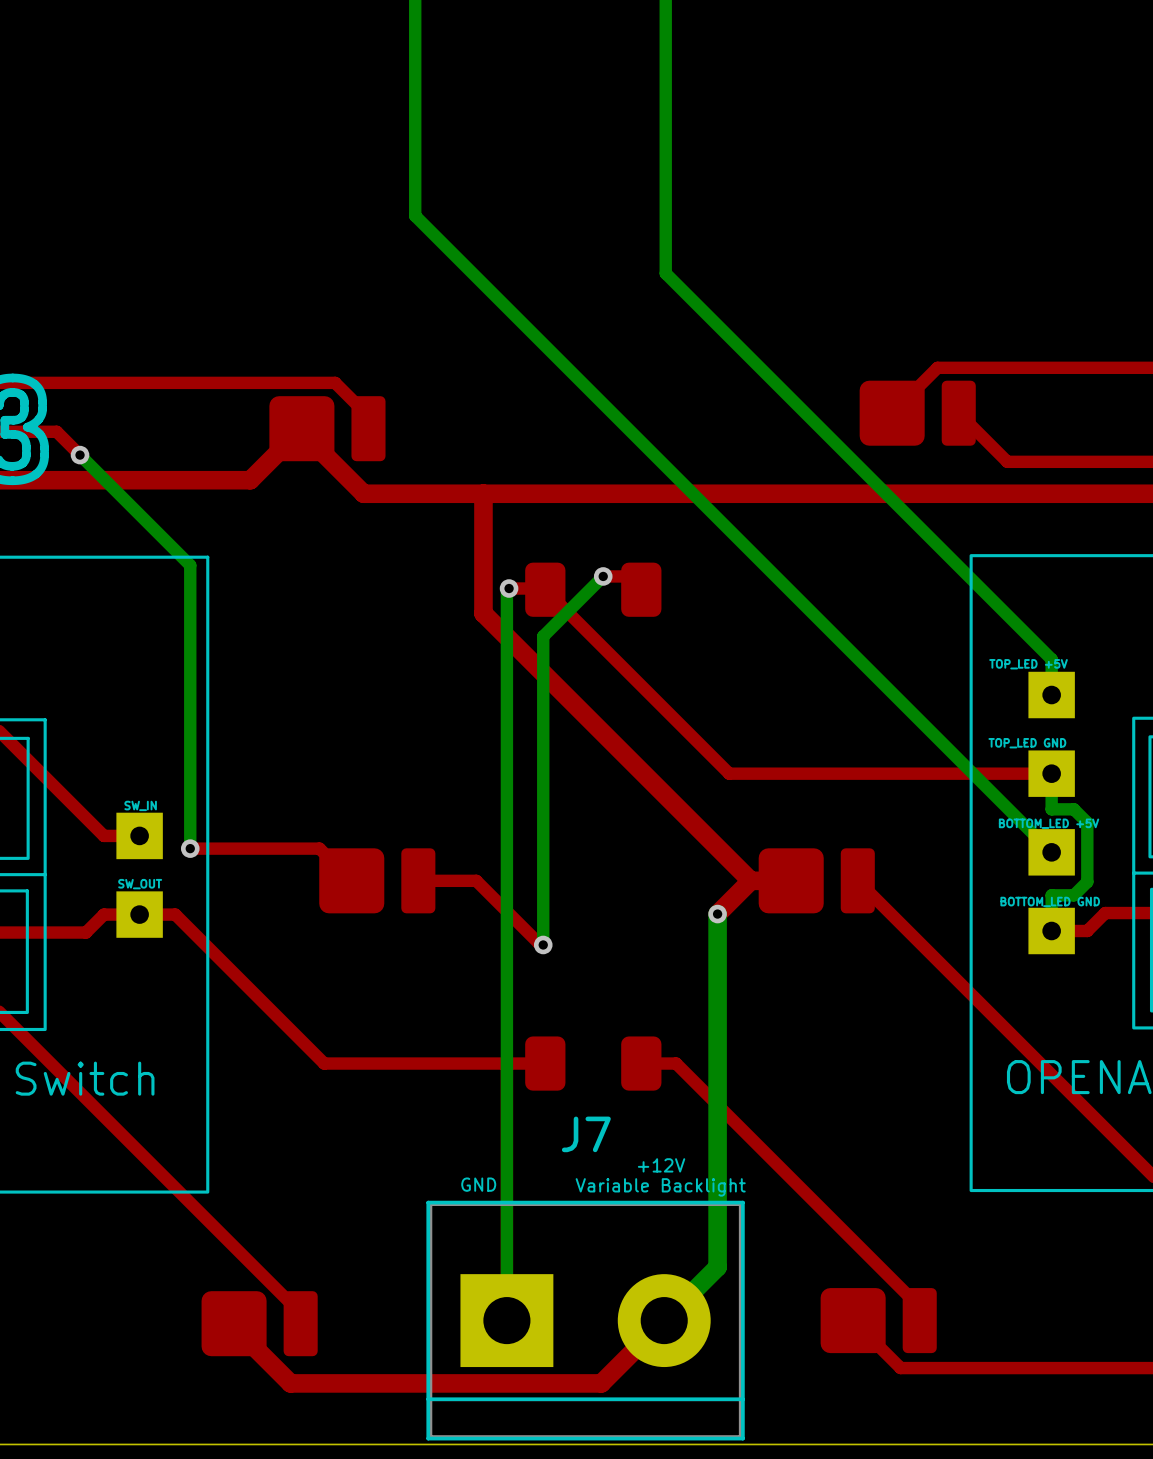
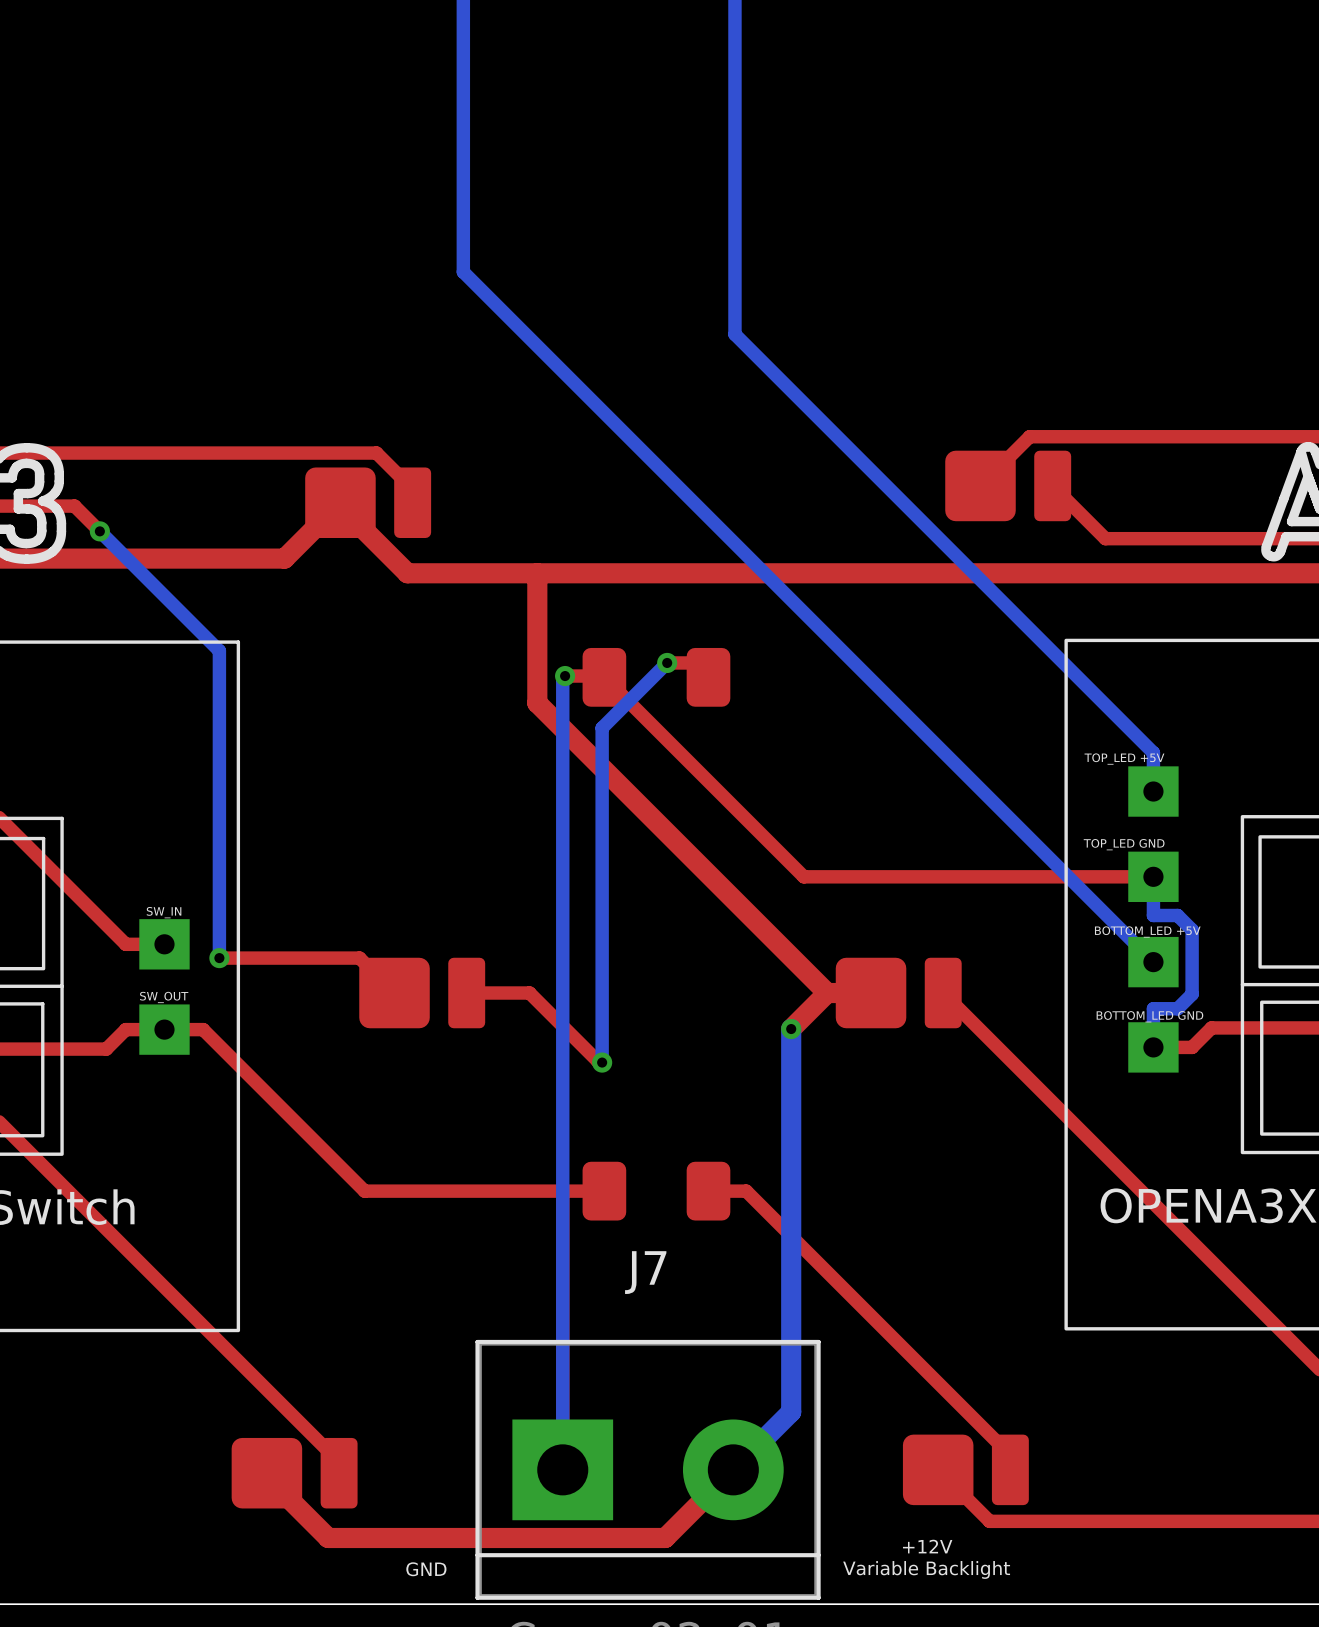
text position: +12V (661, 1165) -> +12V (927, 1546)
text position: GND (478, 1184) -> GND (426, 1569)
text position: Variable Backlight (660, 1187) -> Variable Backlight (926, 1569)

